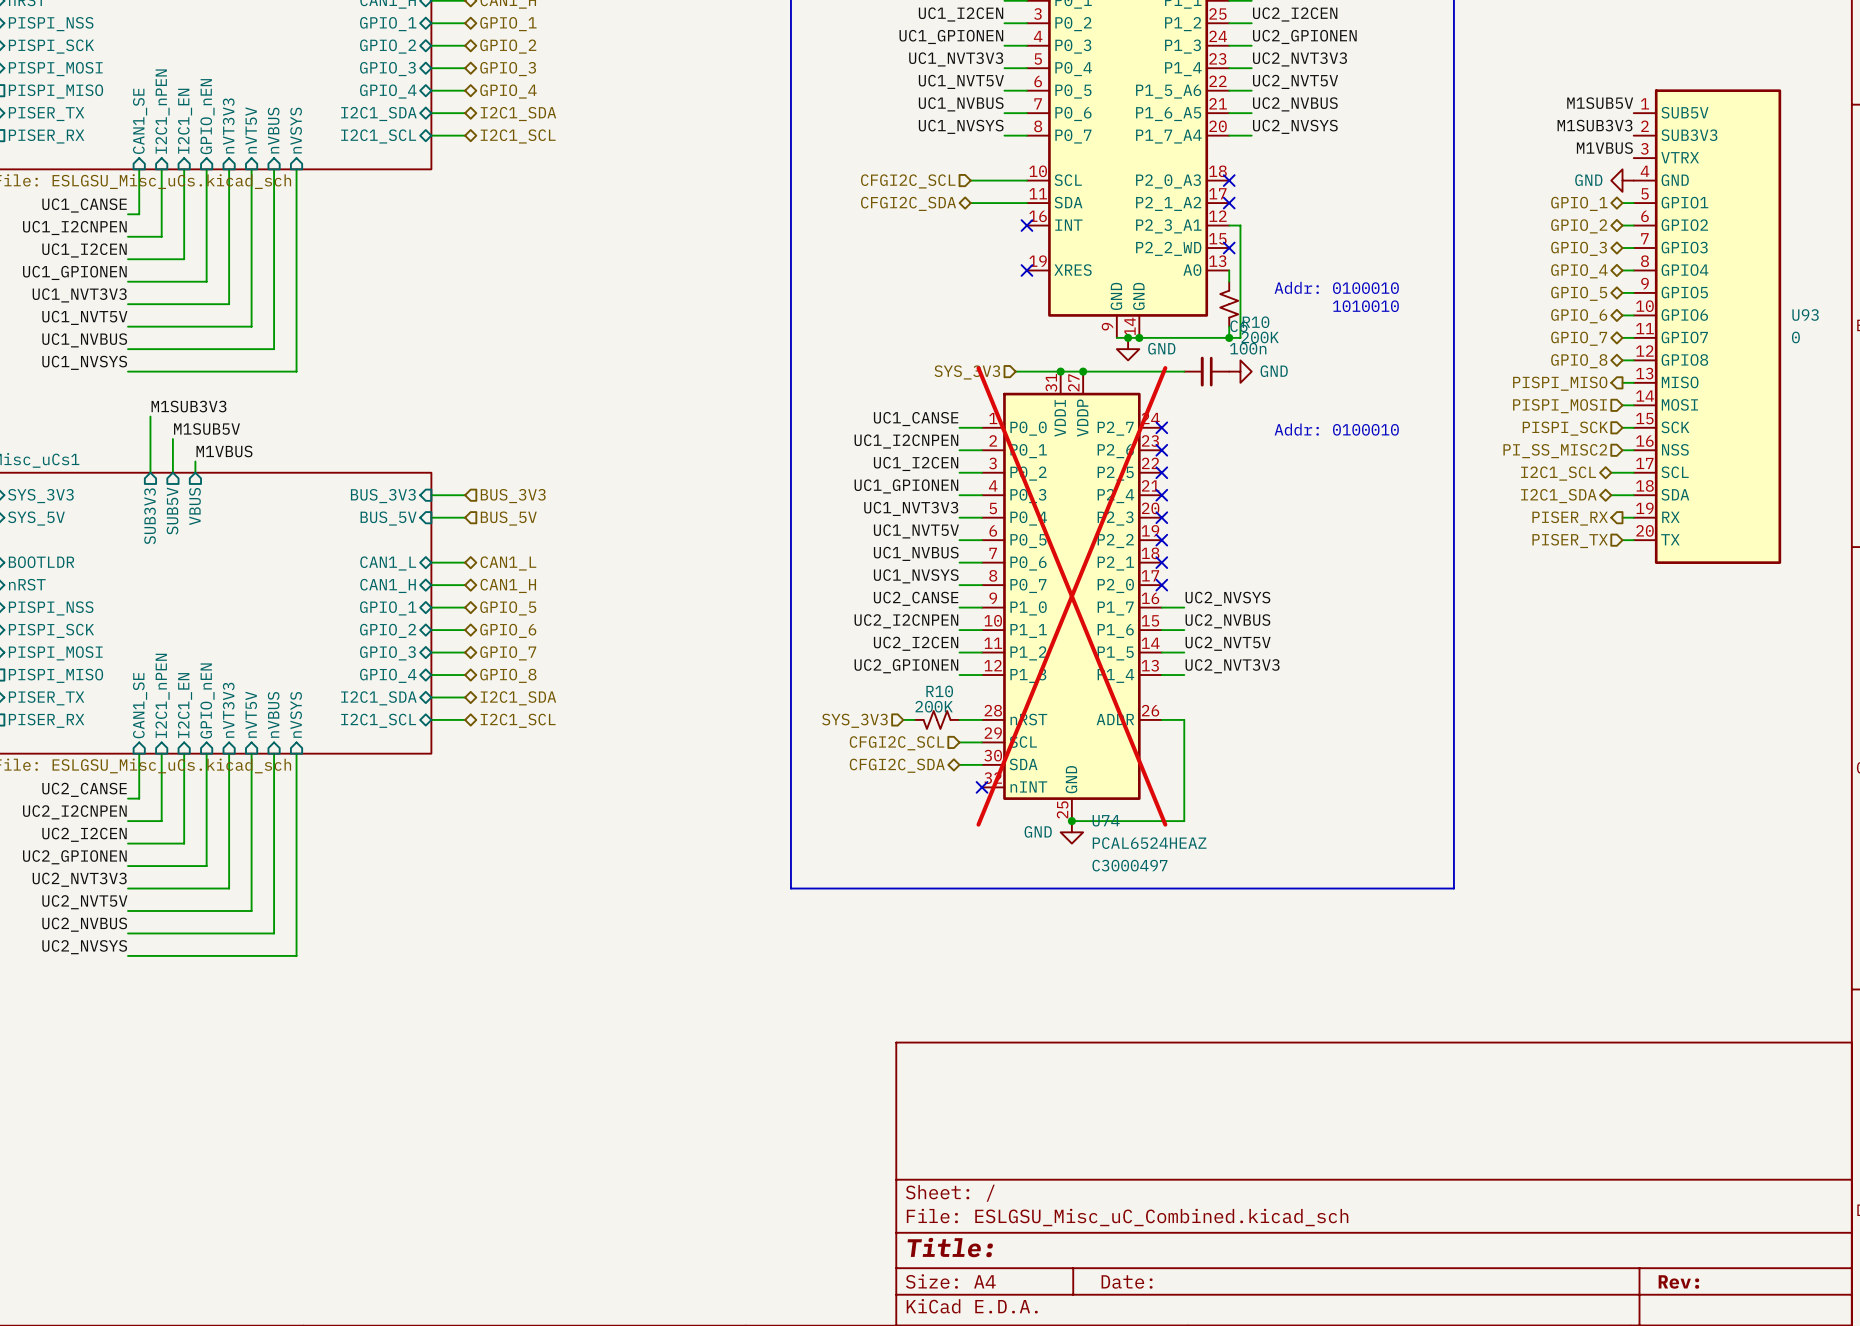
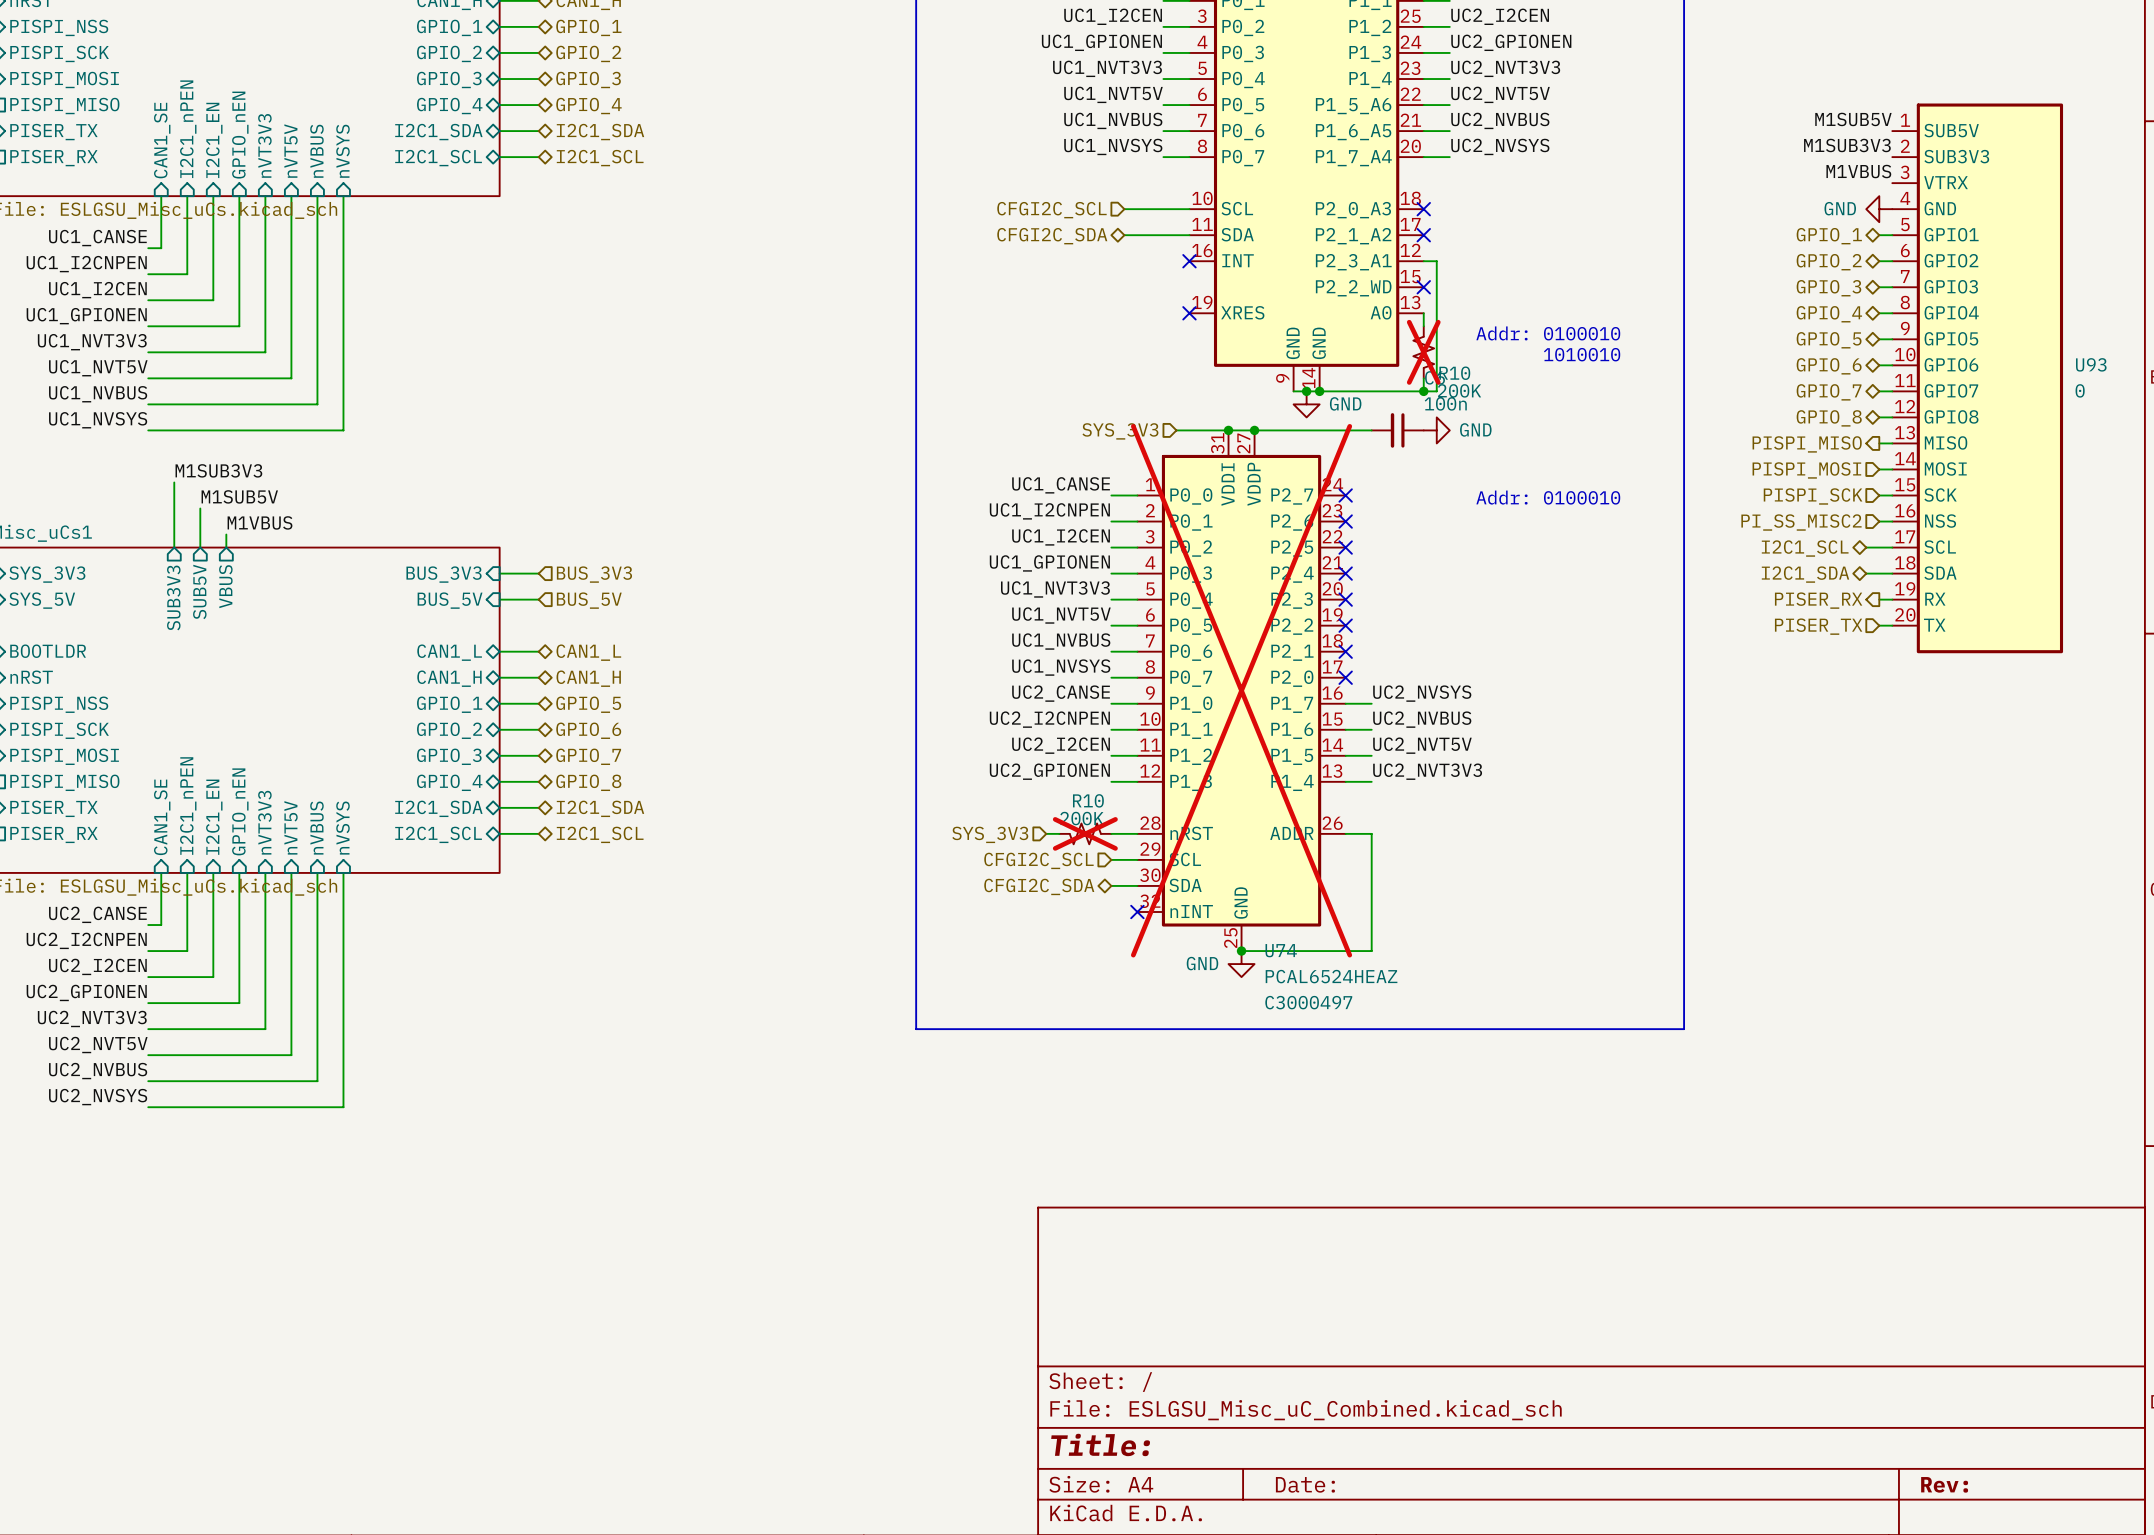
R10 do-not-place cross: none -> (1423, 352)
R10 do-not-place cross: none -> (1085, 833)

